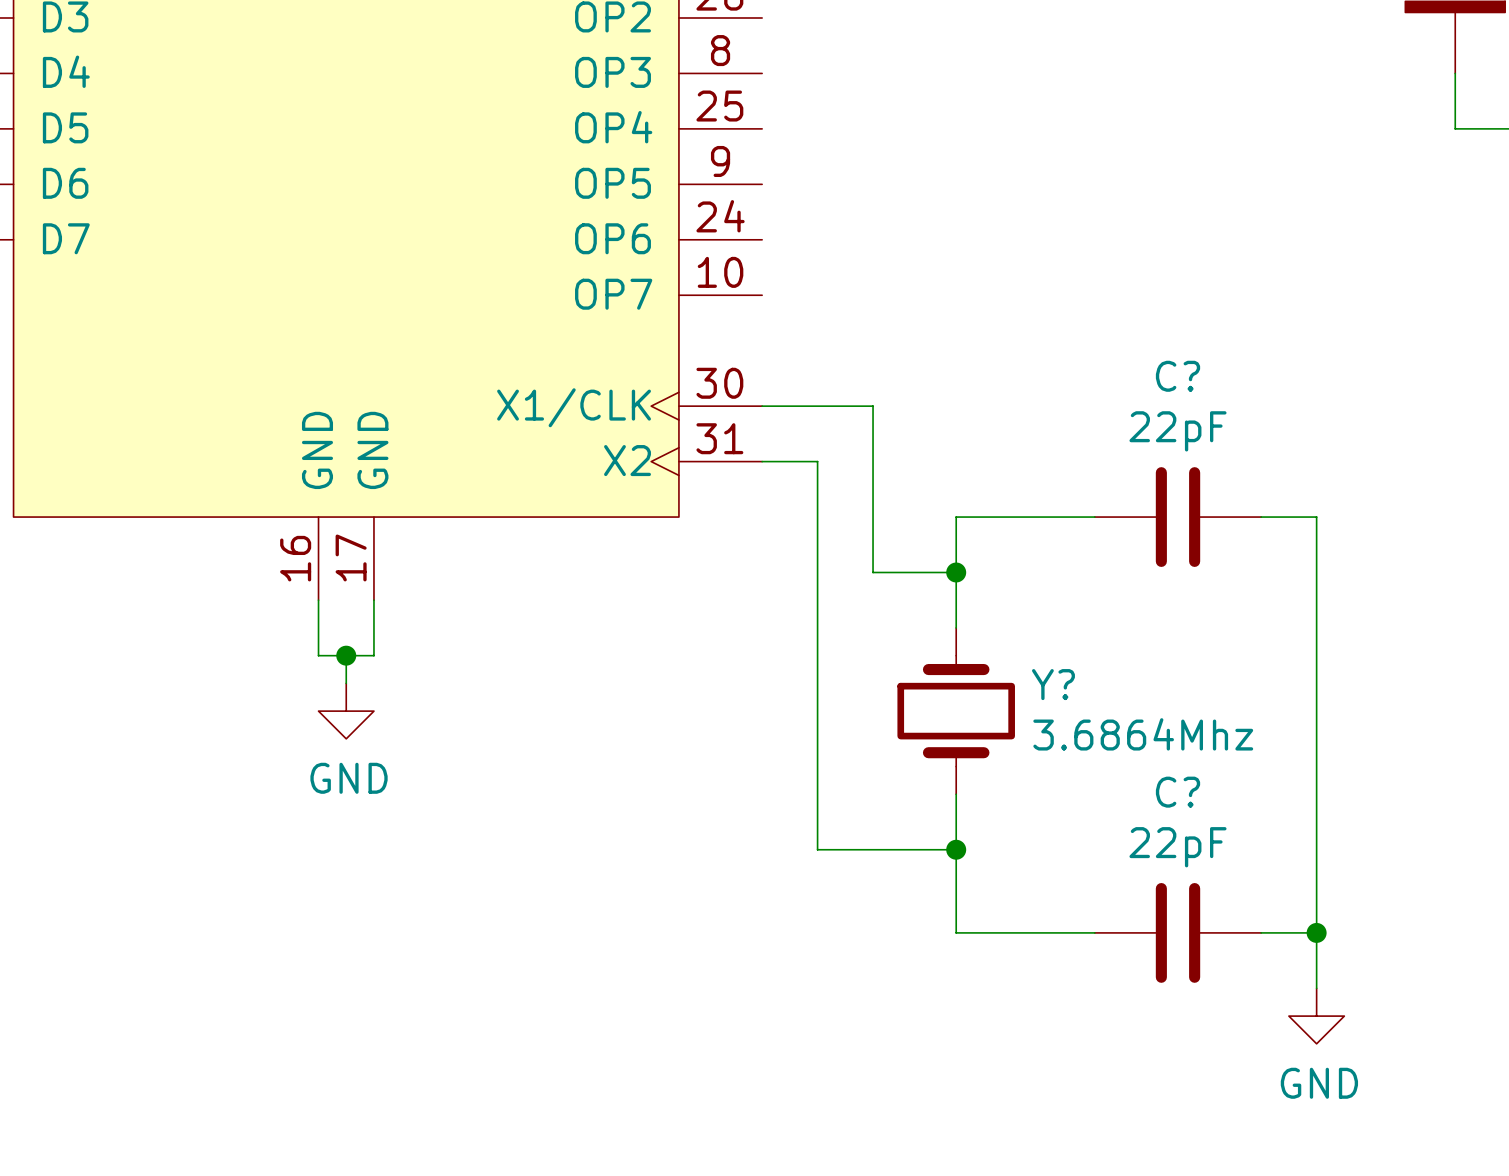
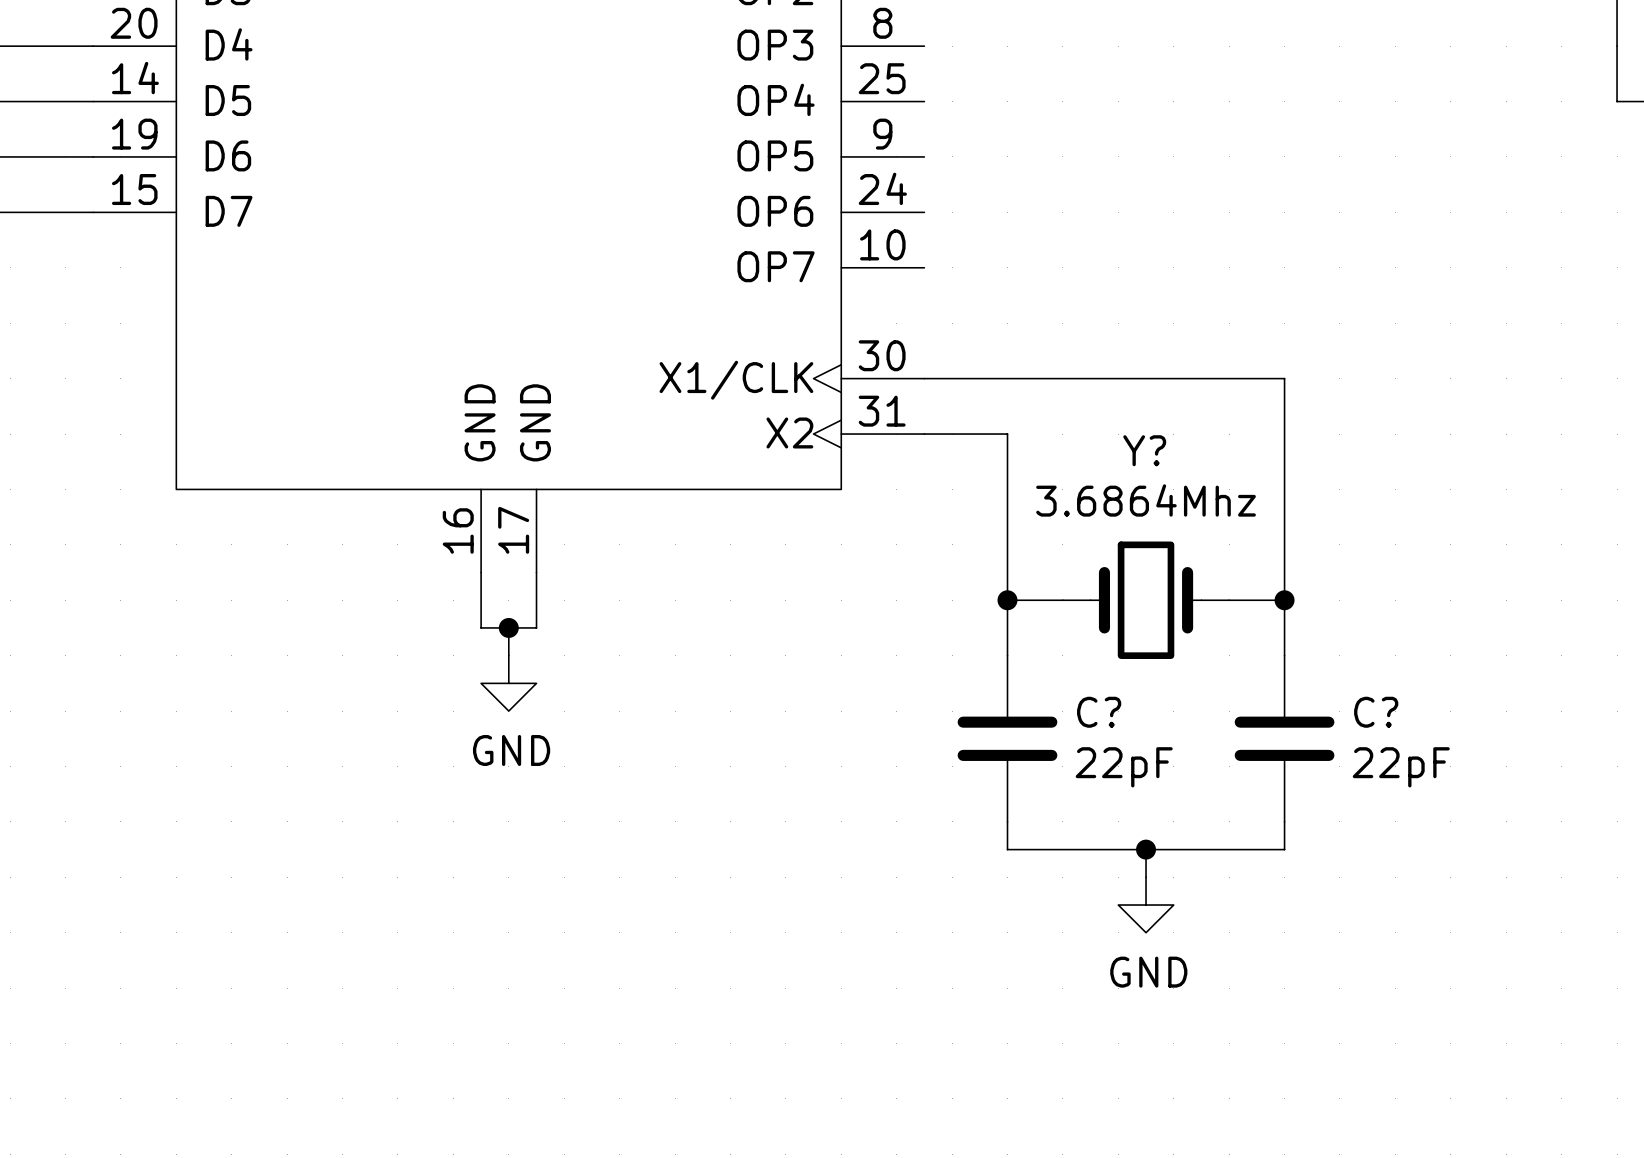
wire: (873, 406) (873, 572) (956, 572) -> (1035, 378) (1284, 378) (1284, 655)
wire: (817, 461) (817, 849) (956, 849) -> (979, 434) (1007, 434) (1007, 655)
wire: (1094, 517) (956, 517) (956, 627) -> none
C?: 22pF (1178, 517) -> none
wire: (1261, 517) (1316, 517) (1316, 988) -> none
junction: (956, 572) -> none
wire: none -> (1007, 600) (1062, 600)
junction: none -> (1007, 600)
junction: none -> (1284, 600)
Y? name position: Y? (1053, 684) -> Y? (1144, 450)
Y? rotation: 0° (956, 711) -> 90° clockwise (1146, 600)
Y? value position: 3.6864Mhz (1143, 734) -> 3.6864Mhz (1146, 500)
C?: none -> 22pF (1007, 738)
C?: none -> 22pF (1284, 738)
wire: (956, 794) (956, 932) (1094, 932) -> none
wire: none -> (1007, 821) (1007, 849) (1284, 849) (1284, 821)
junction position: (956, 849) -> (1146, 849)
wire: none -> (1146, 849) (1146, 877)
C?: 22pF (1178, 932) -> none
wire: (1261, 932) (1316, 932) -> (1229, 600) (1284, 600)
junction: (1316, 932) -> none
power symbol position: GND (1316, 1016) -> GND (1146, 905)

